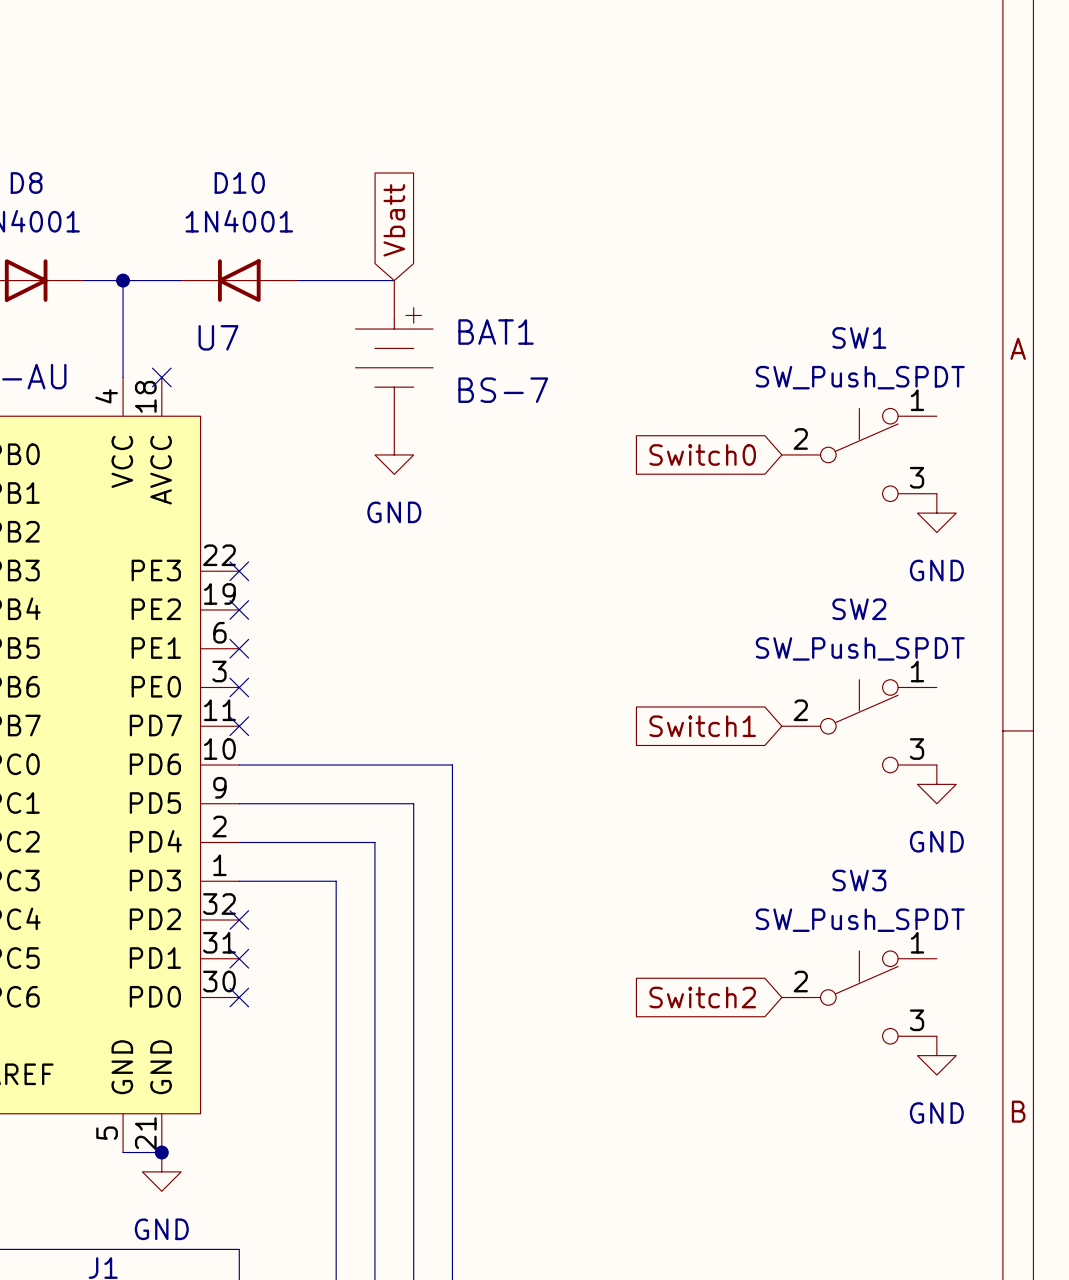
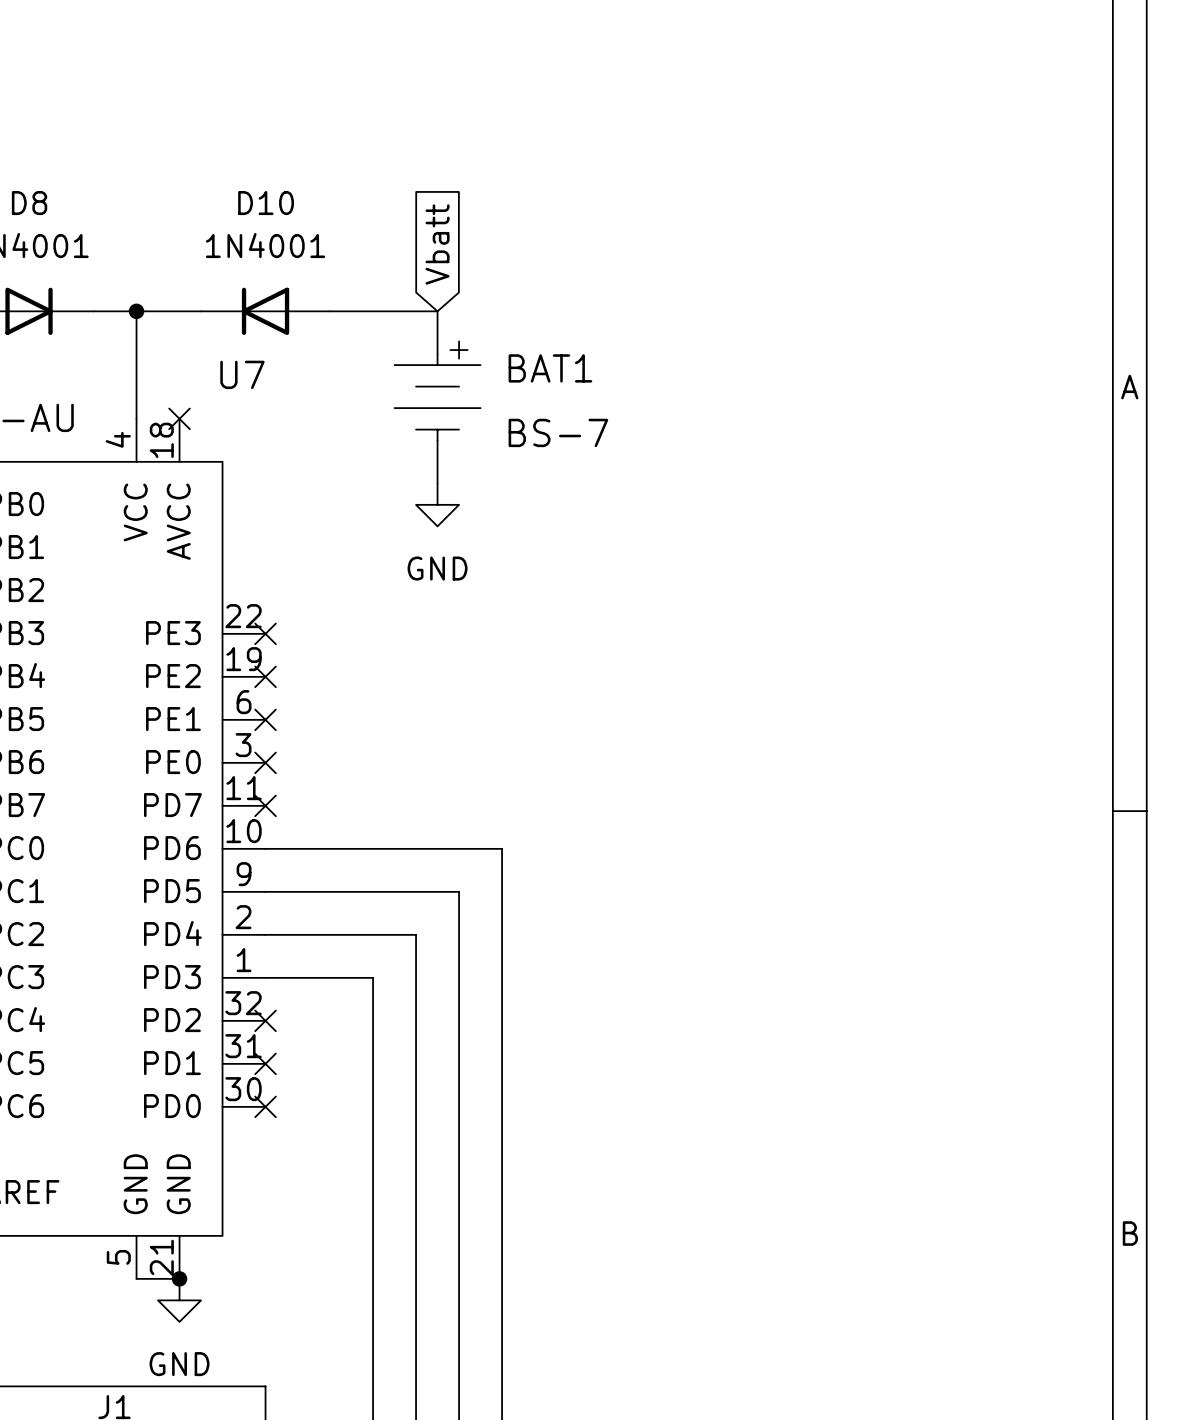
global label: Switch0 (702, 454) -> none
SW1: SW_Push_SPDT (859, 454) -> none
power symbol: GND (936, 513) -> none
global label: Switch1 (702, 726) -> none
SW2: SW_Push_SPDT (859, 726) -> none
power symbol: GND (936, 784) -> none
global label: Switch2 (702, 997) -> none
SW3: SW_Push_SPDT (859, 997) -> none
power symbol: GND (936, 1055) -> none

